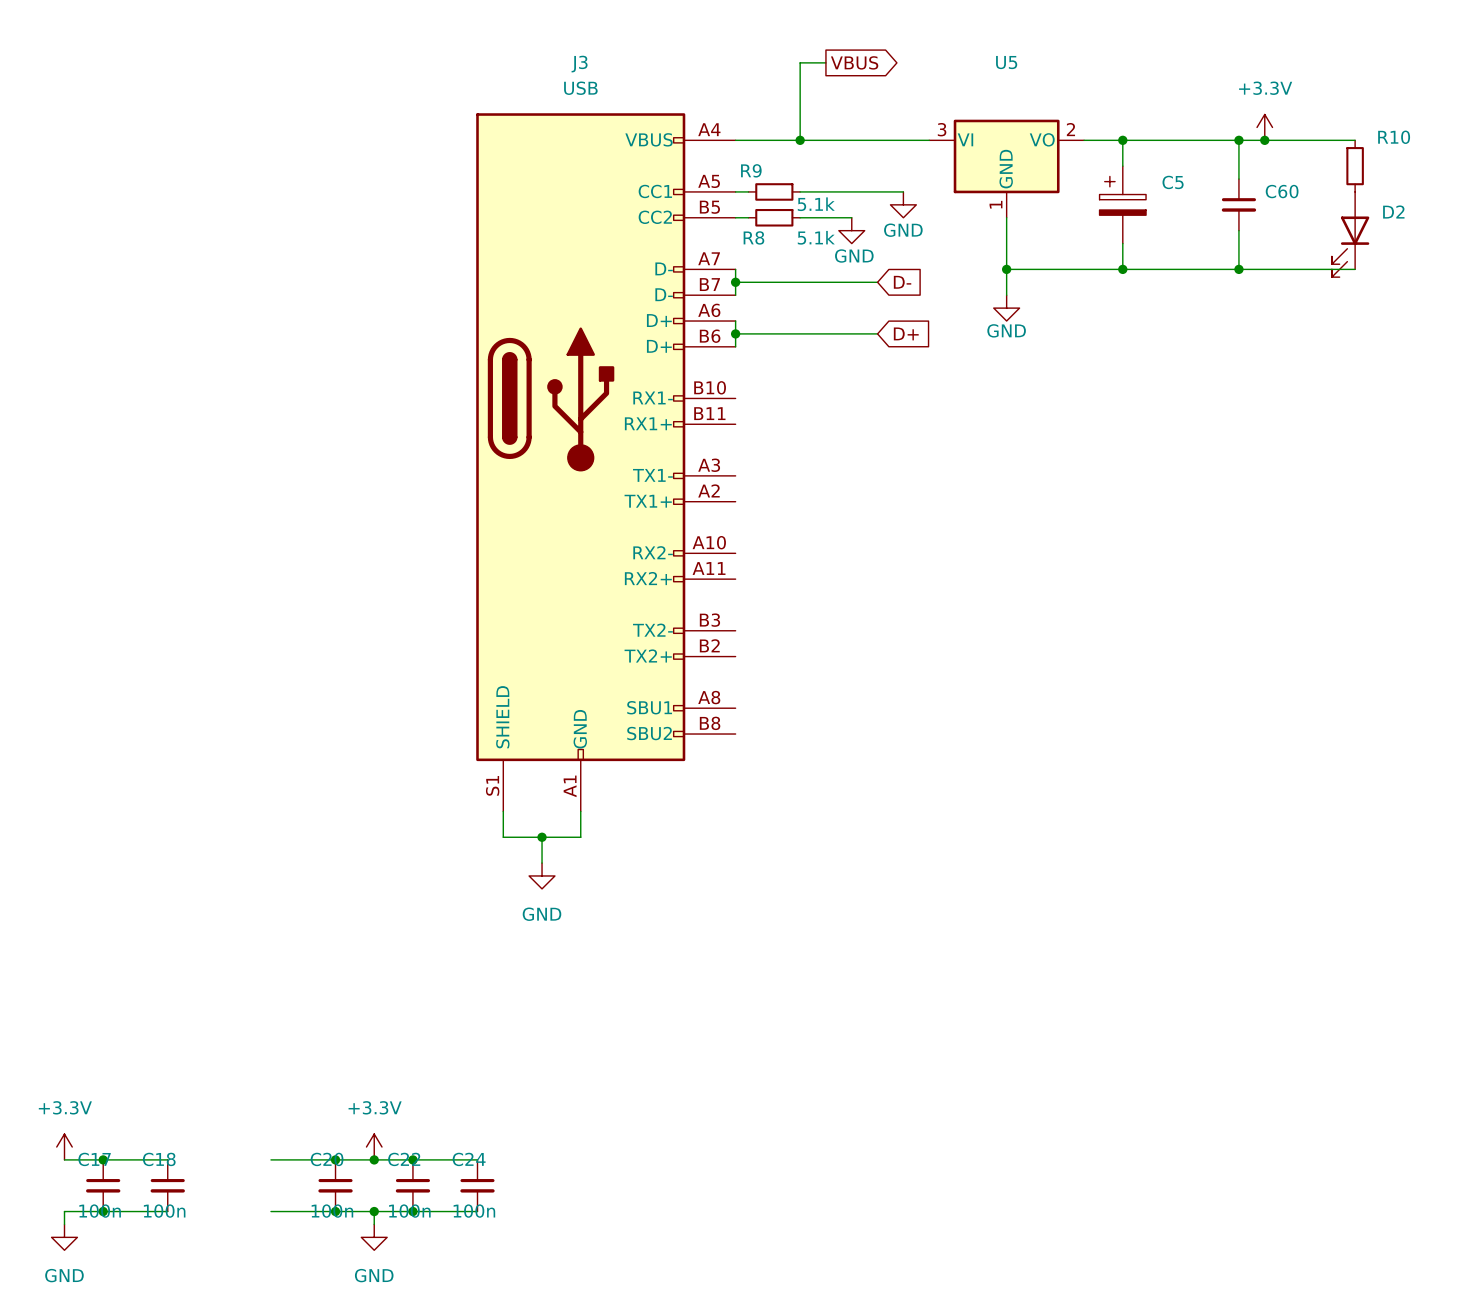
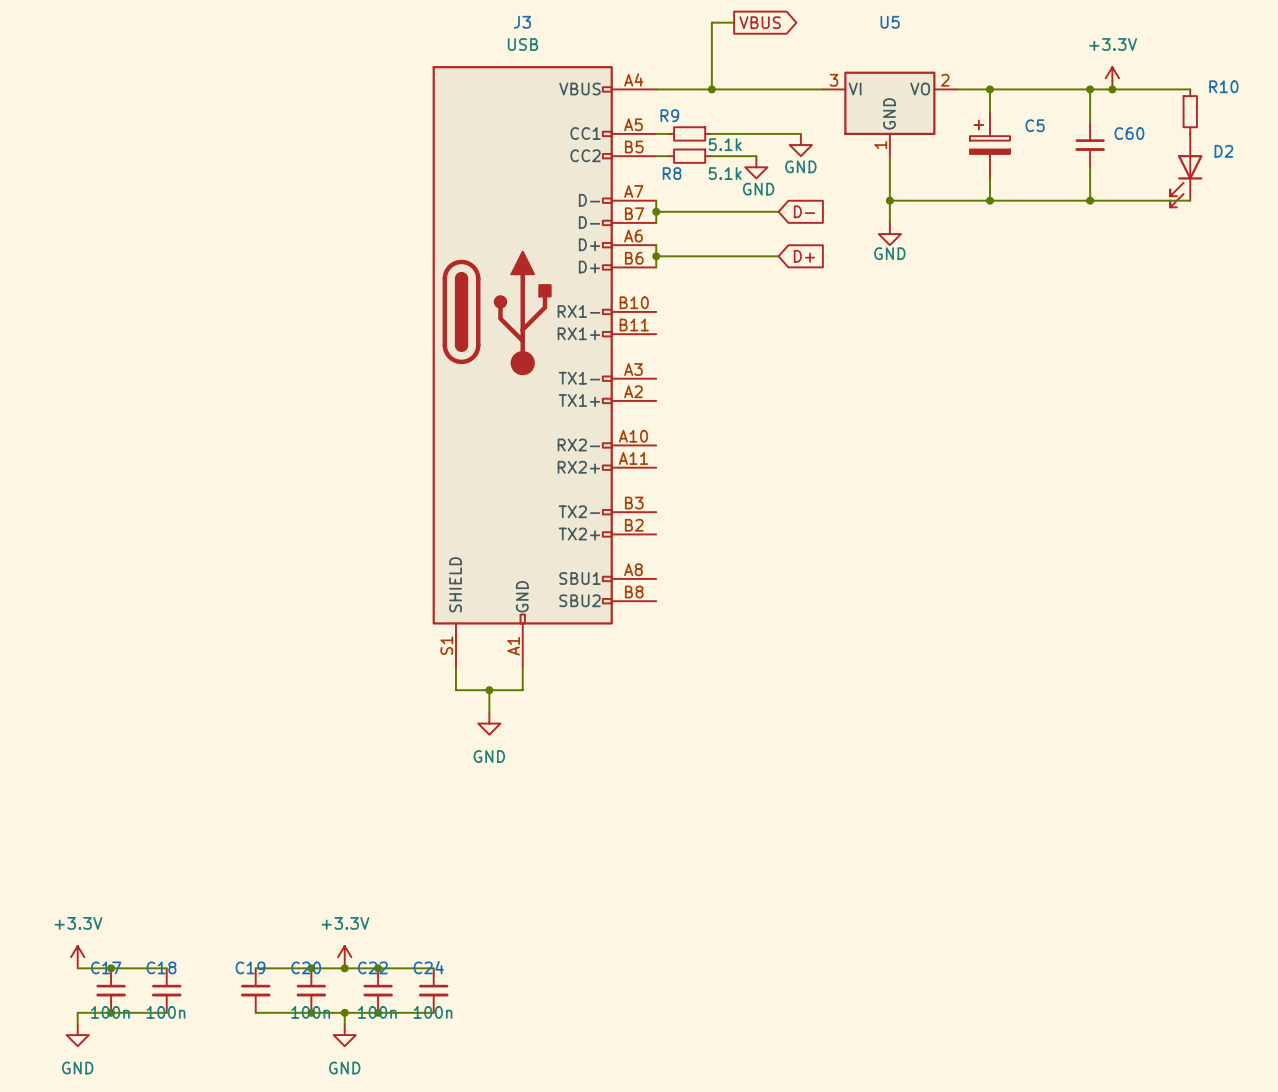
C19: none -> (255, 990)

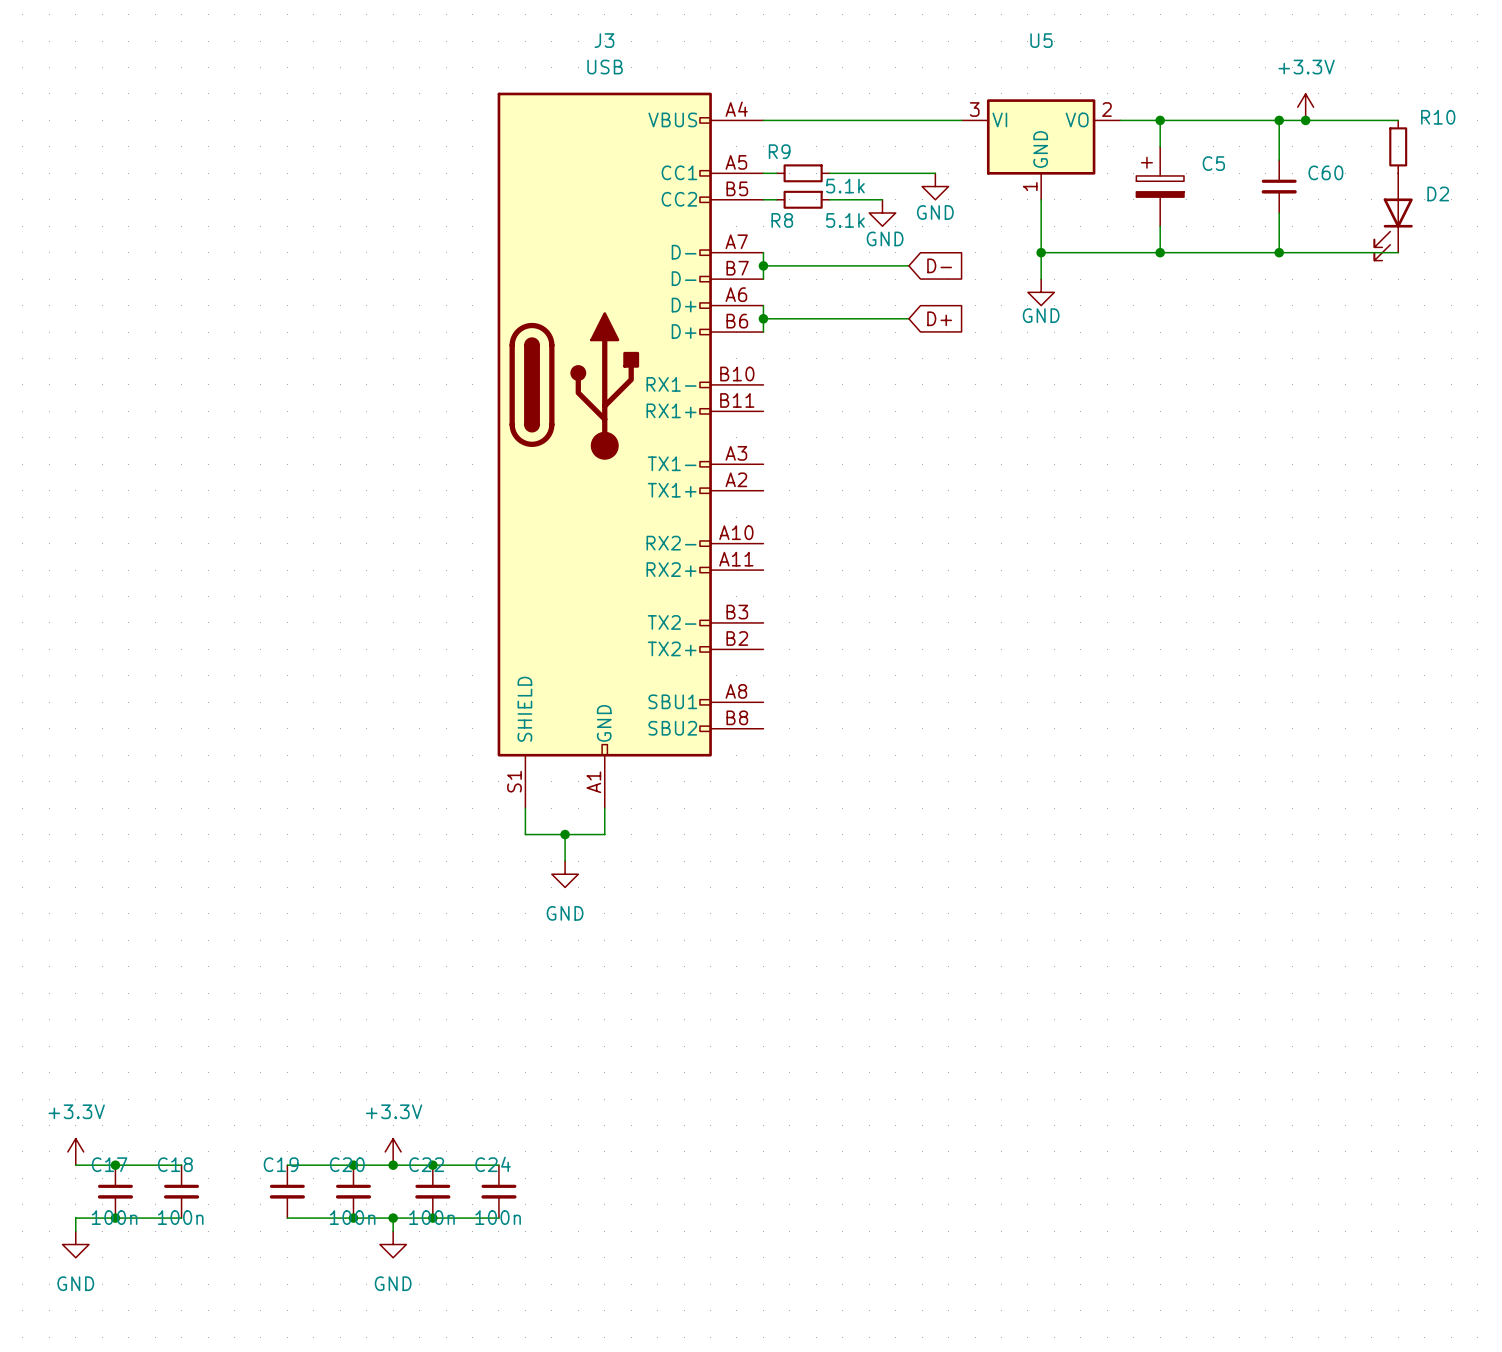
wire: (734, 22) (711, 22) (711, 89) -> none
global label: VBUS (760, 22) -> none
junction: (711, 89) -> none

